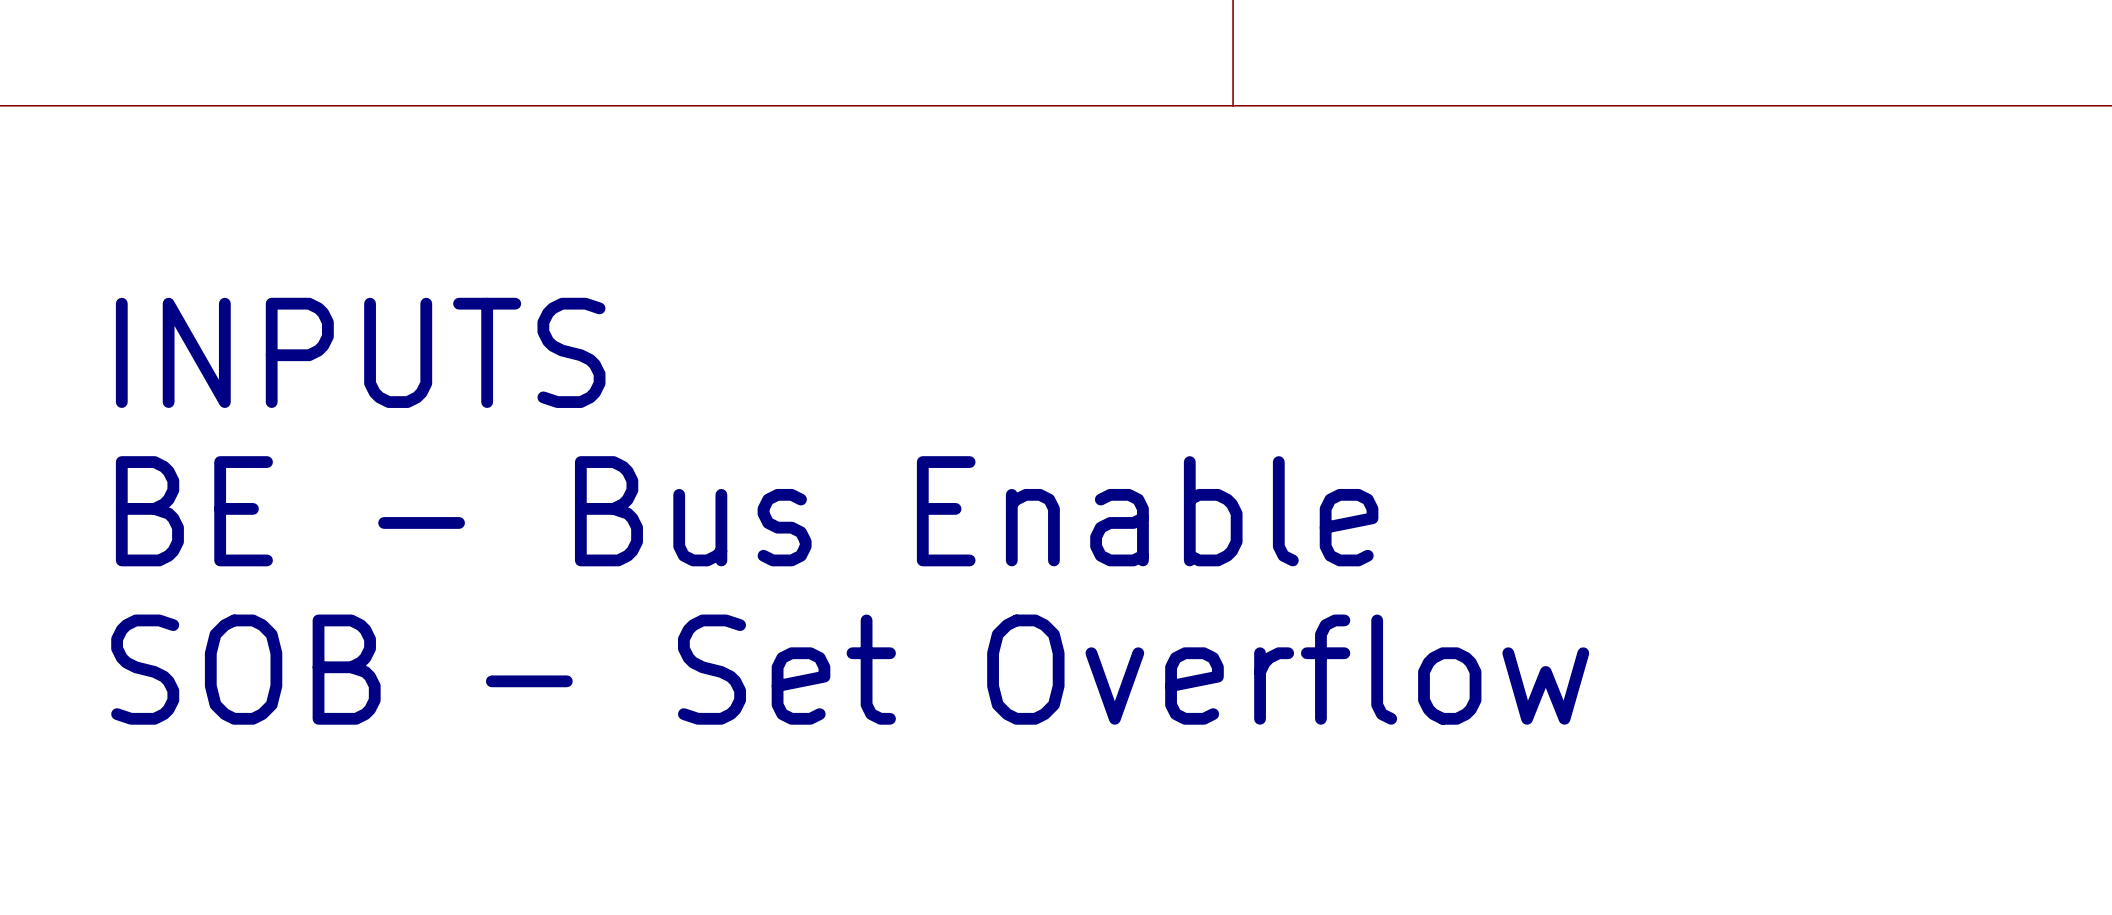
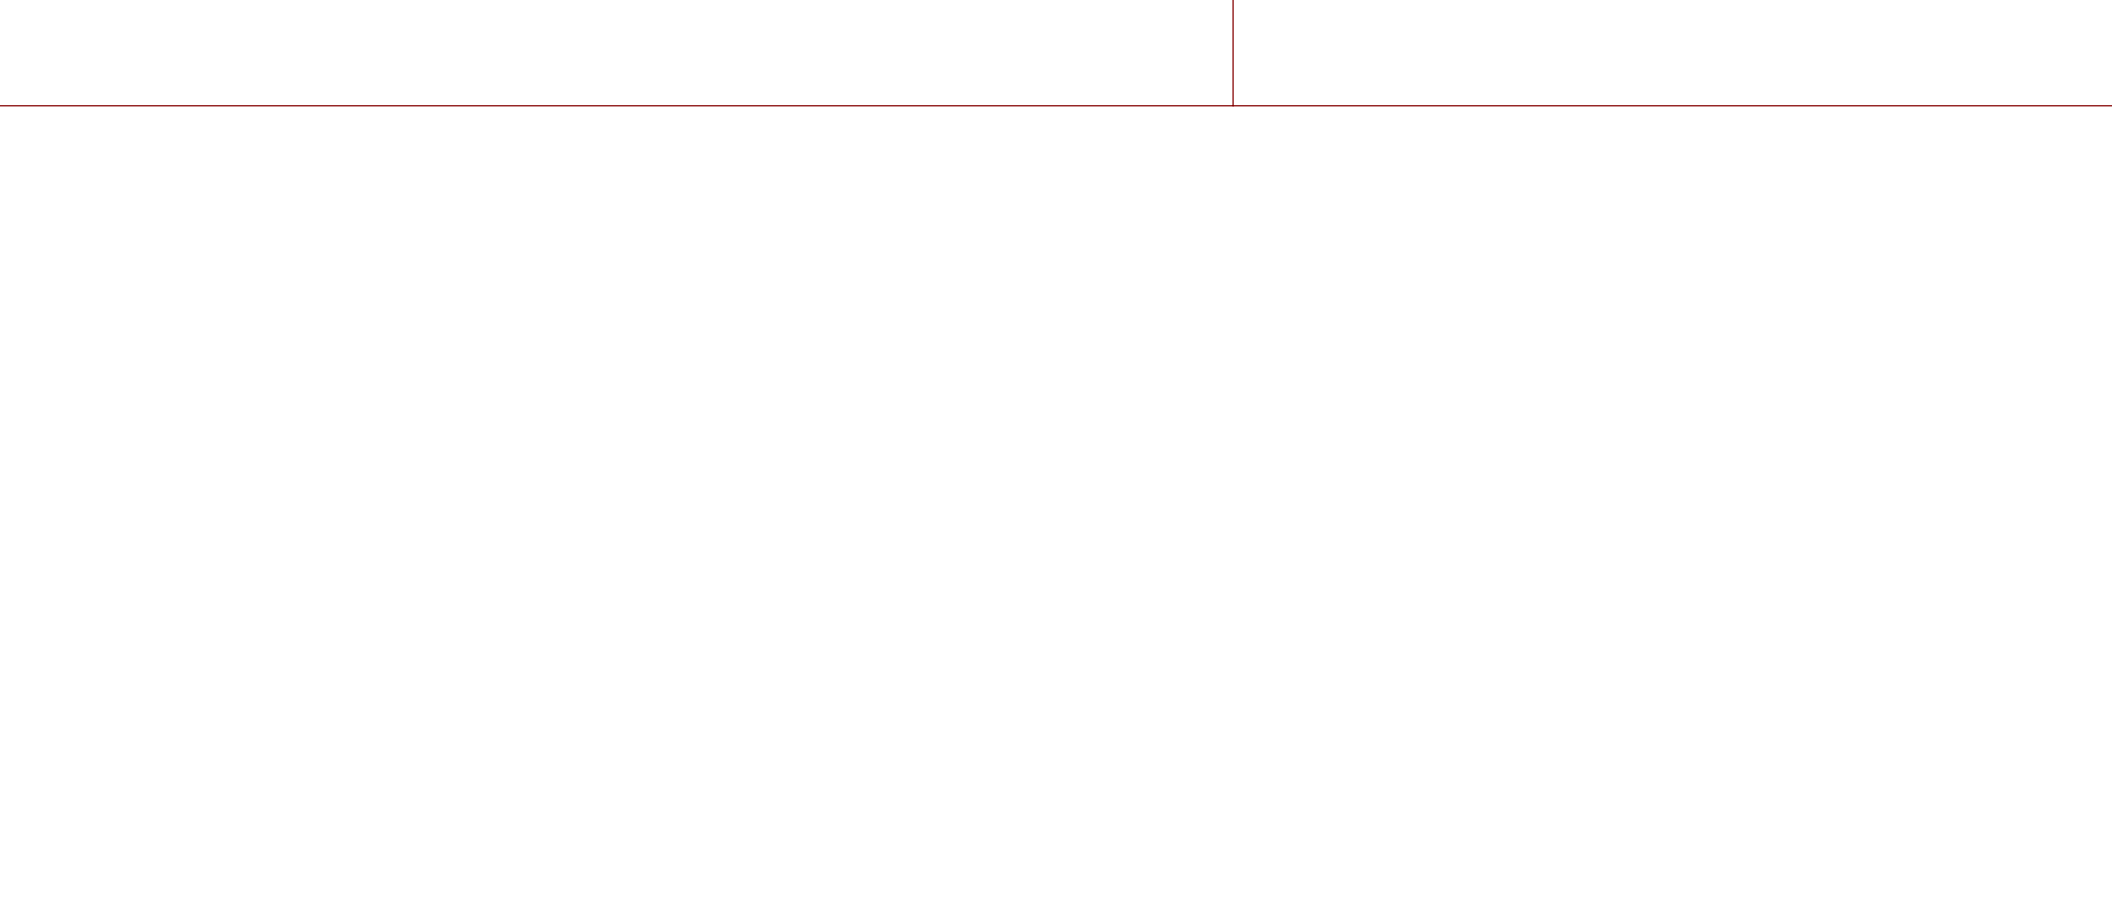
text: INPUTS (360, 352) -> none
text: BE - Bus Enable (747, 511) -> none
text: SOB - Set Overflow (850, 669) -> none

